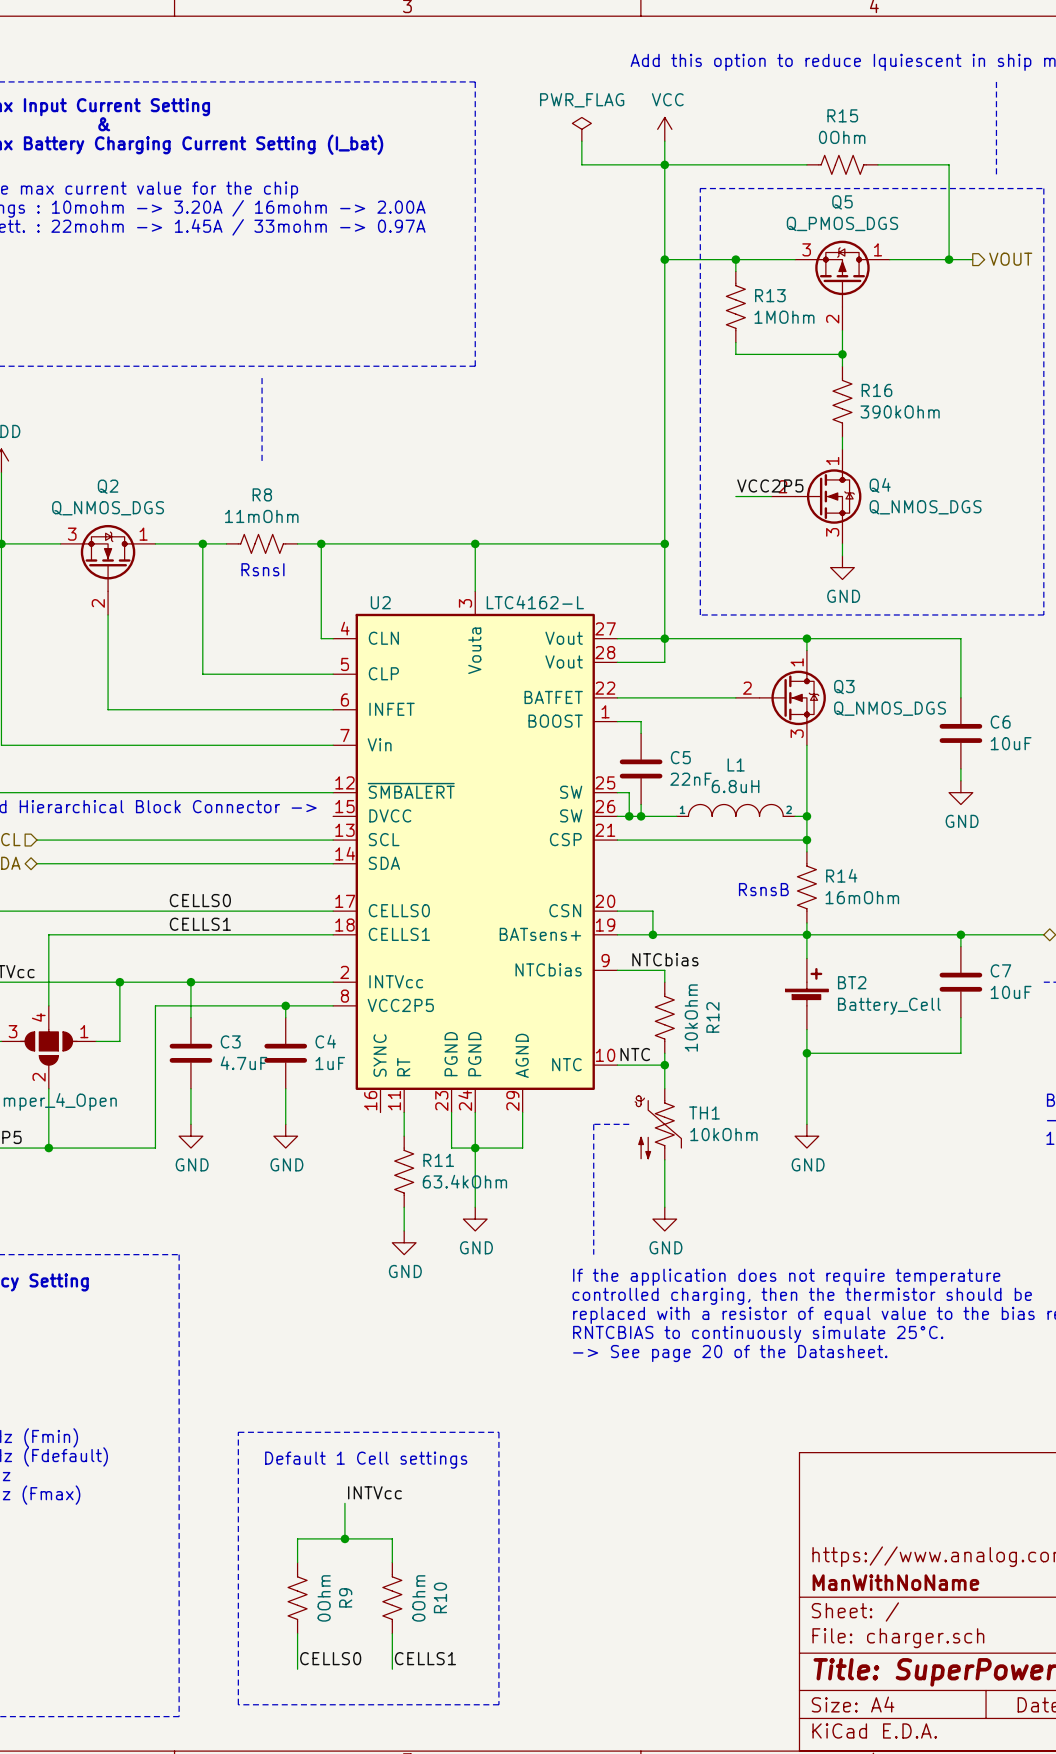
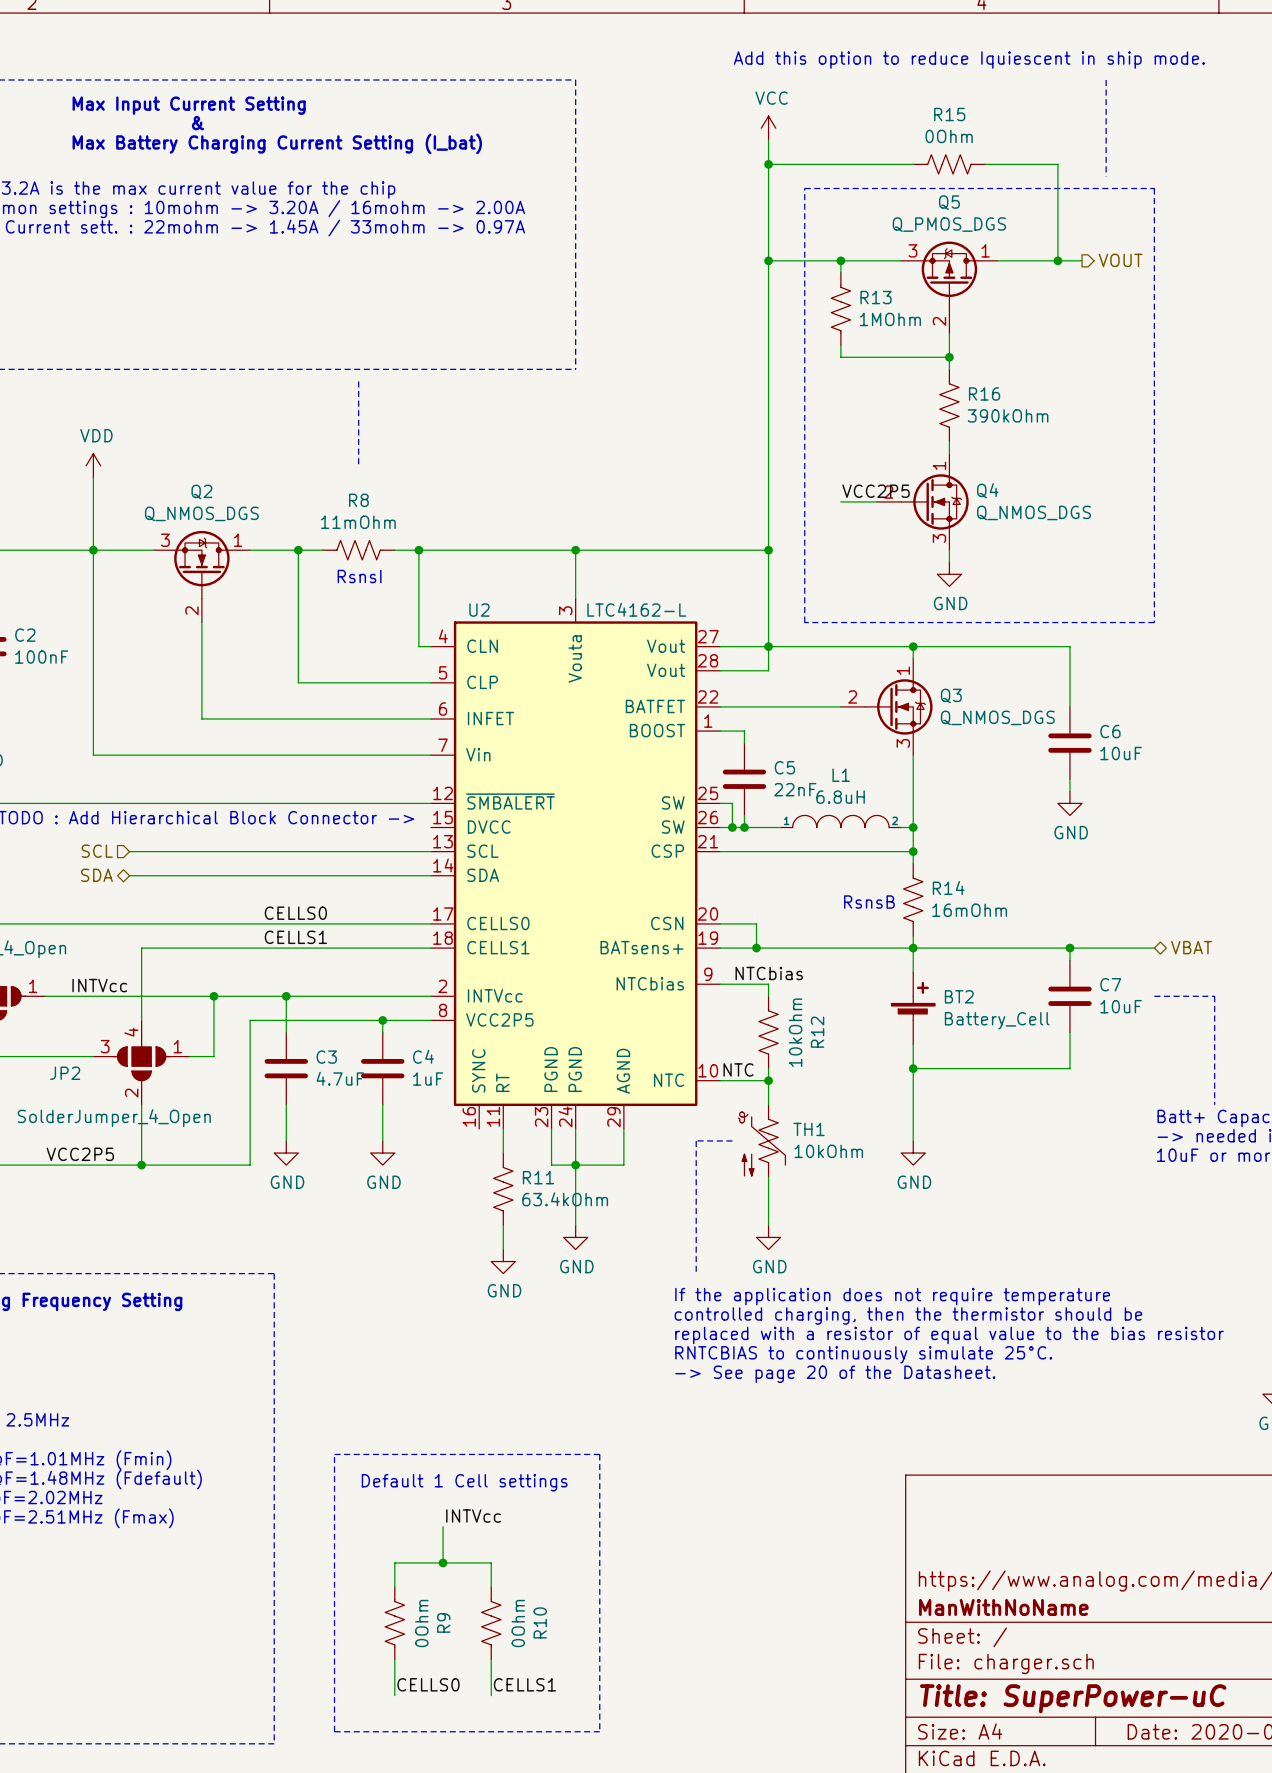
power symbol: PWR_FLAG (581, 129) -> none
wire: (581, 141) (581, 164) (664, 164) -> none

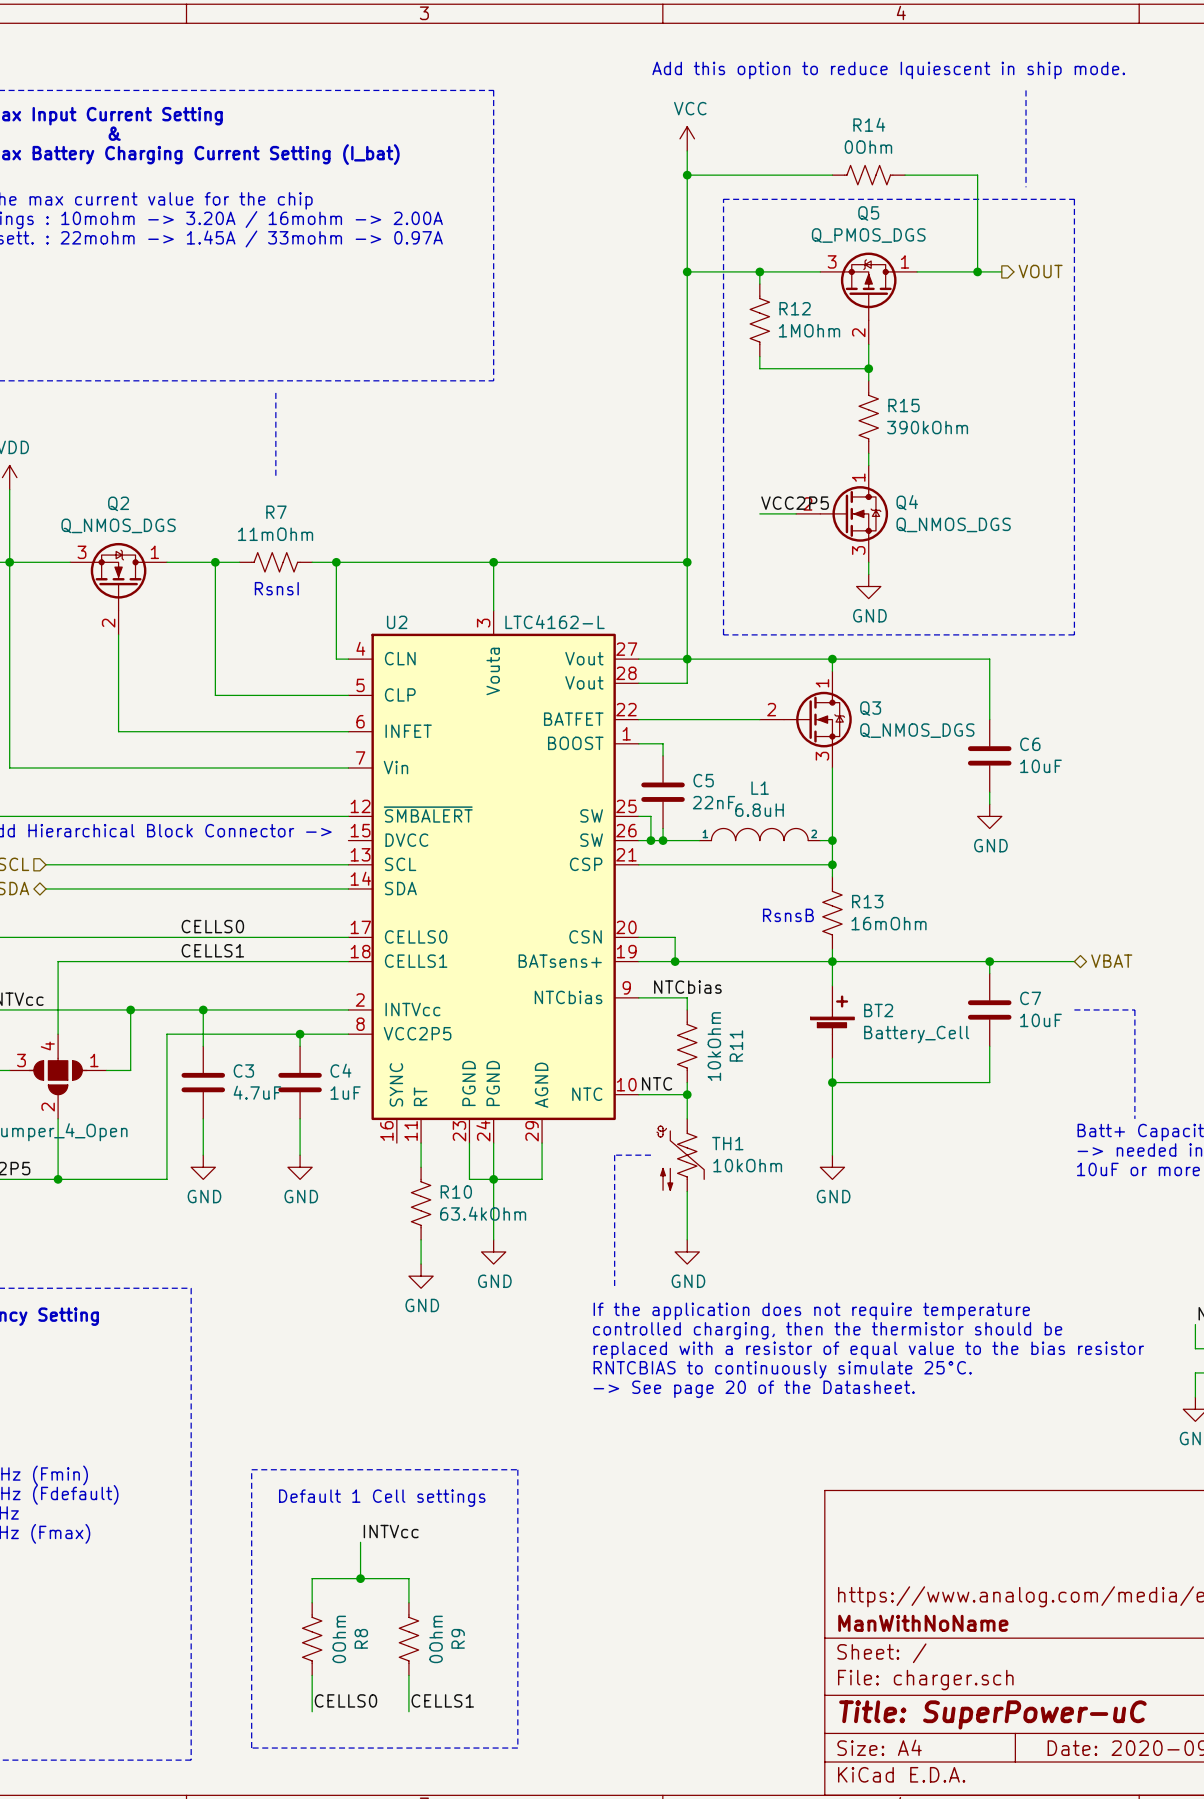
R15 name: R15 (949, 114) -> R14 (869, 124)
R13 name: R13 (876, 297) -> R12 (795, 308)
R16 name: R16 (984, 393) -> R15 (903, 405)
R8 name: R8 (358, 500) -> R7 (276, 512)
R14 name: R14 (948, 888) -> R13 (867, 901)
R12 name: R12 (817, 1032) -> R11 (736, 1045)
R11 name: R11 (538, 1177) -> R10 (456, 1191)
R9 name: R9 (443, 1622) -> R8 (361, 1638)
R10 name: R10 (540, 1622) -> R9 (458, 1638)

